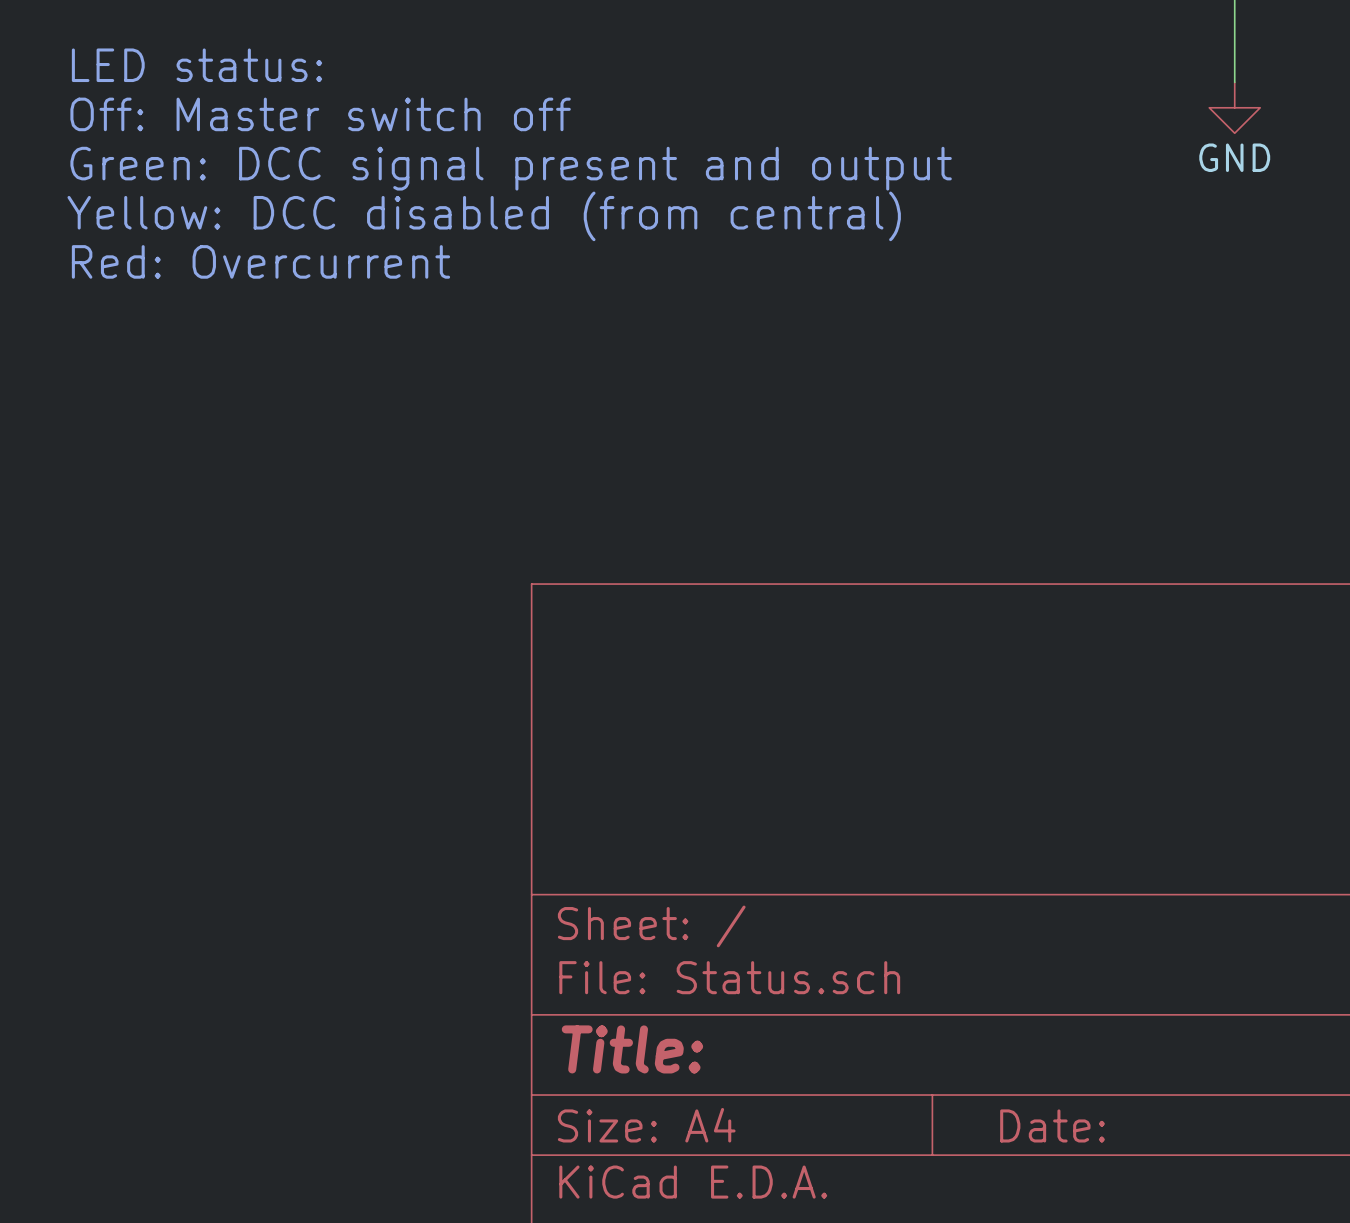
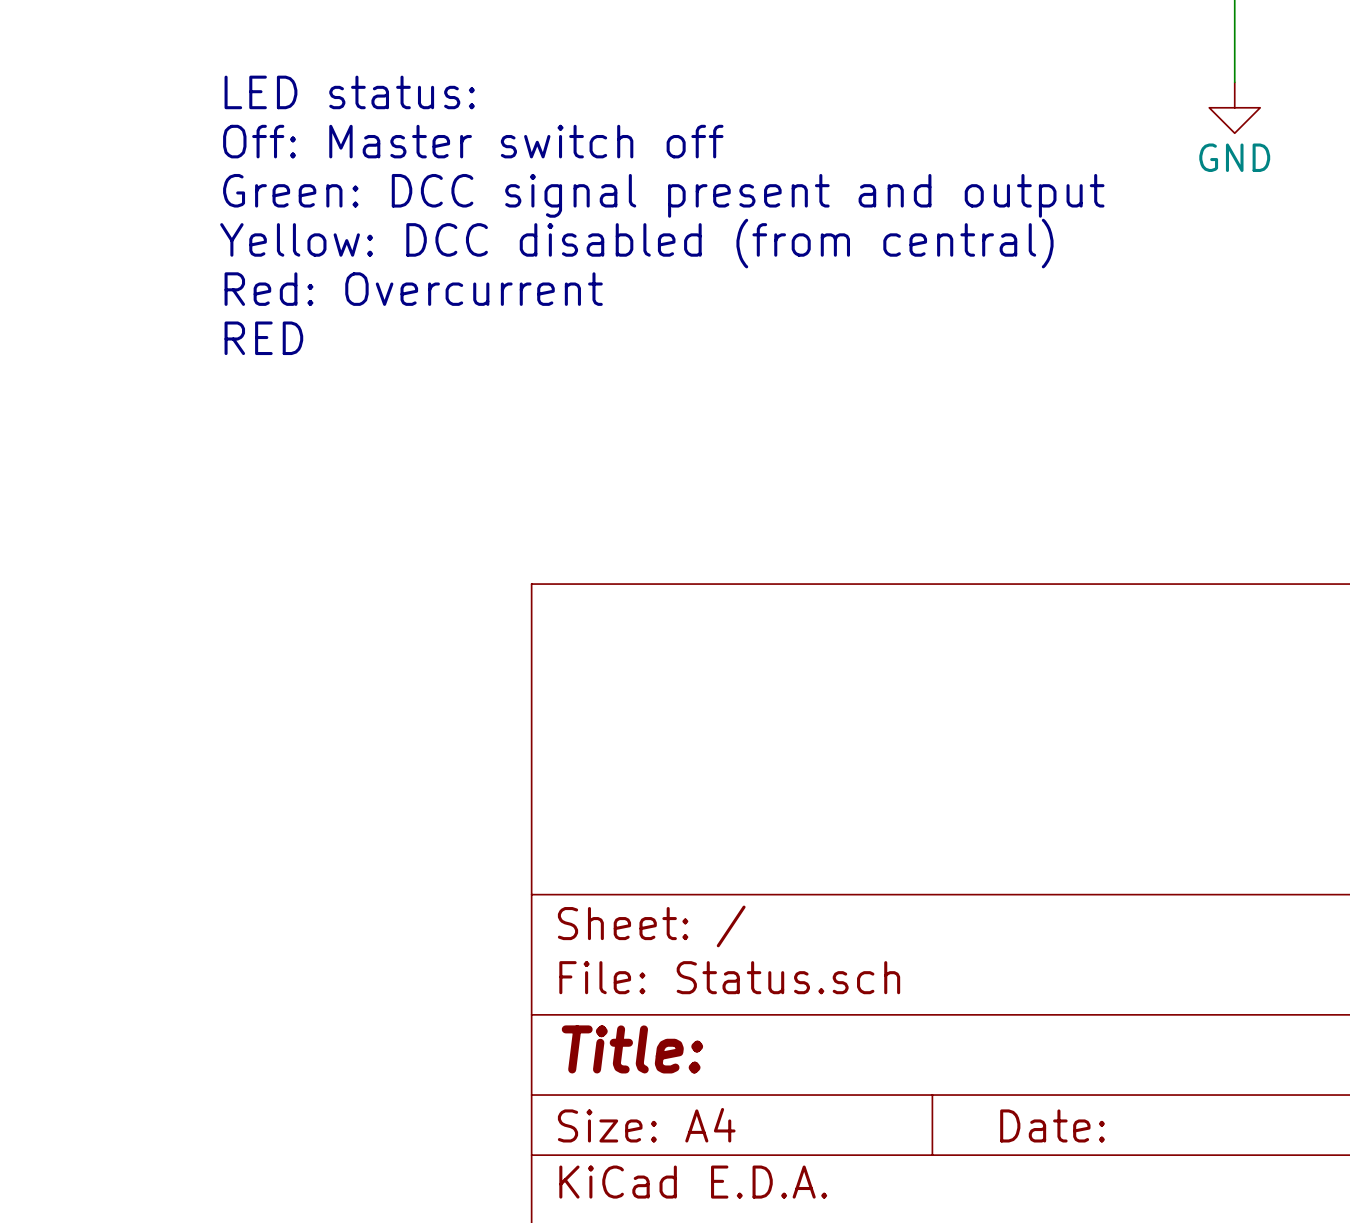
text position: LED status: (196, 65) -> LED status: (349, 92)
text position: Off: Master switch off (320, 114) -> Off: Master switch off (473, 141)
text position: Green: DCC signal present and output (511, 168) -> Green: DCC signal present and output (663, 195)
text position: Yellow: DCC disabled (from central) (484, 216) -> Yellow: DCC disabled (from central) (636, 243)
text position: Red: Overcurrent (260, 261) -> Red: Overcurrent (413, 289)
text: none -> RED (263, 338)

